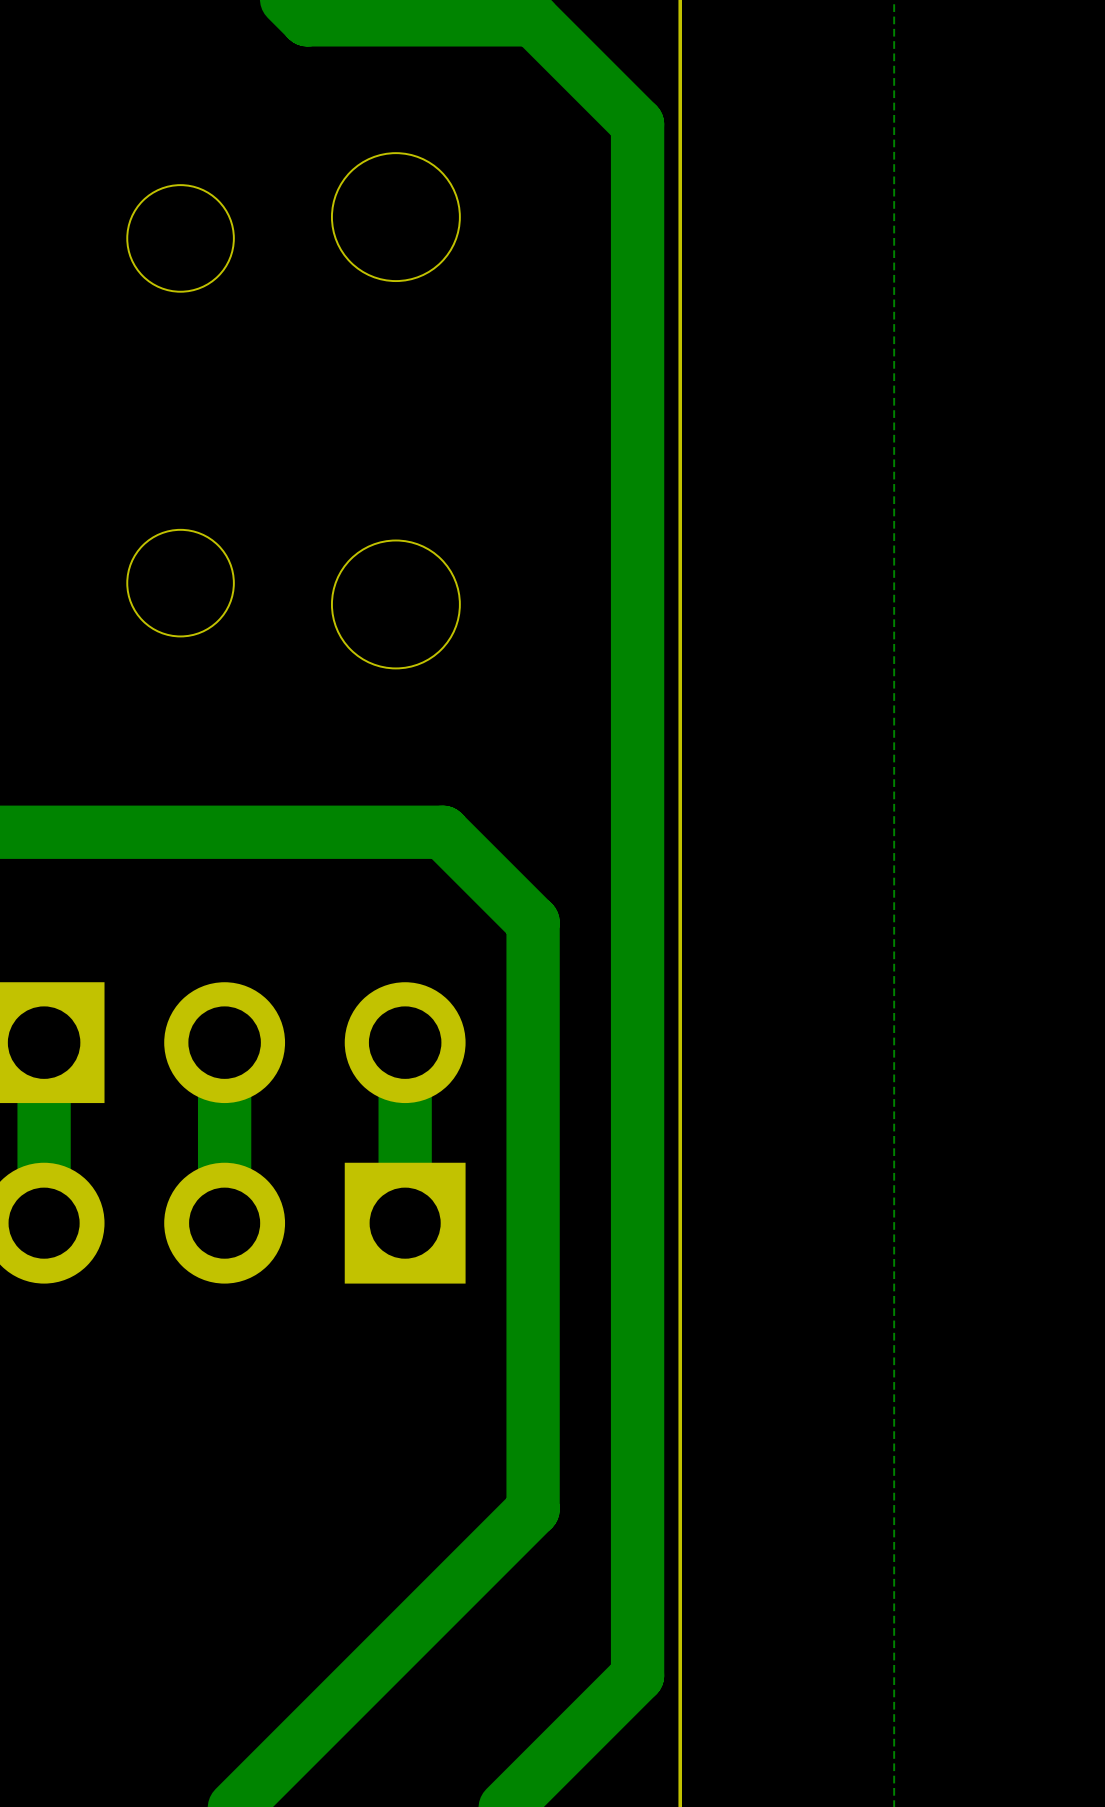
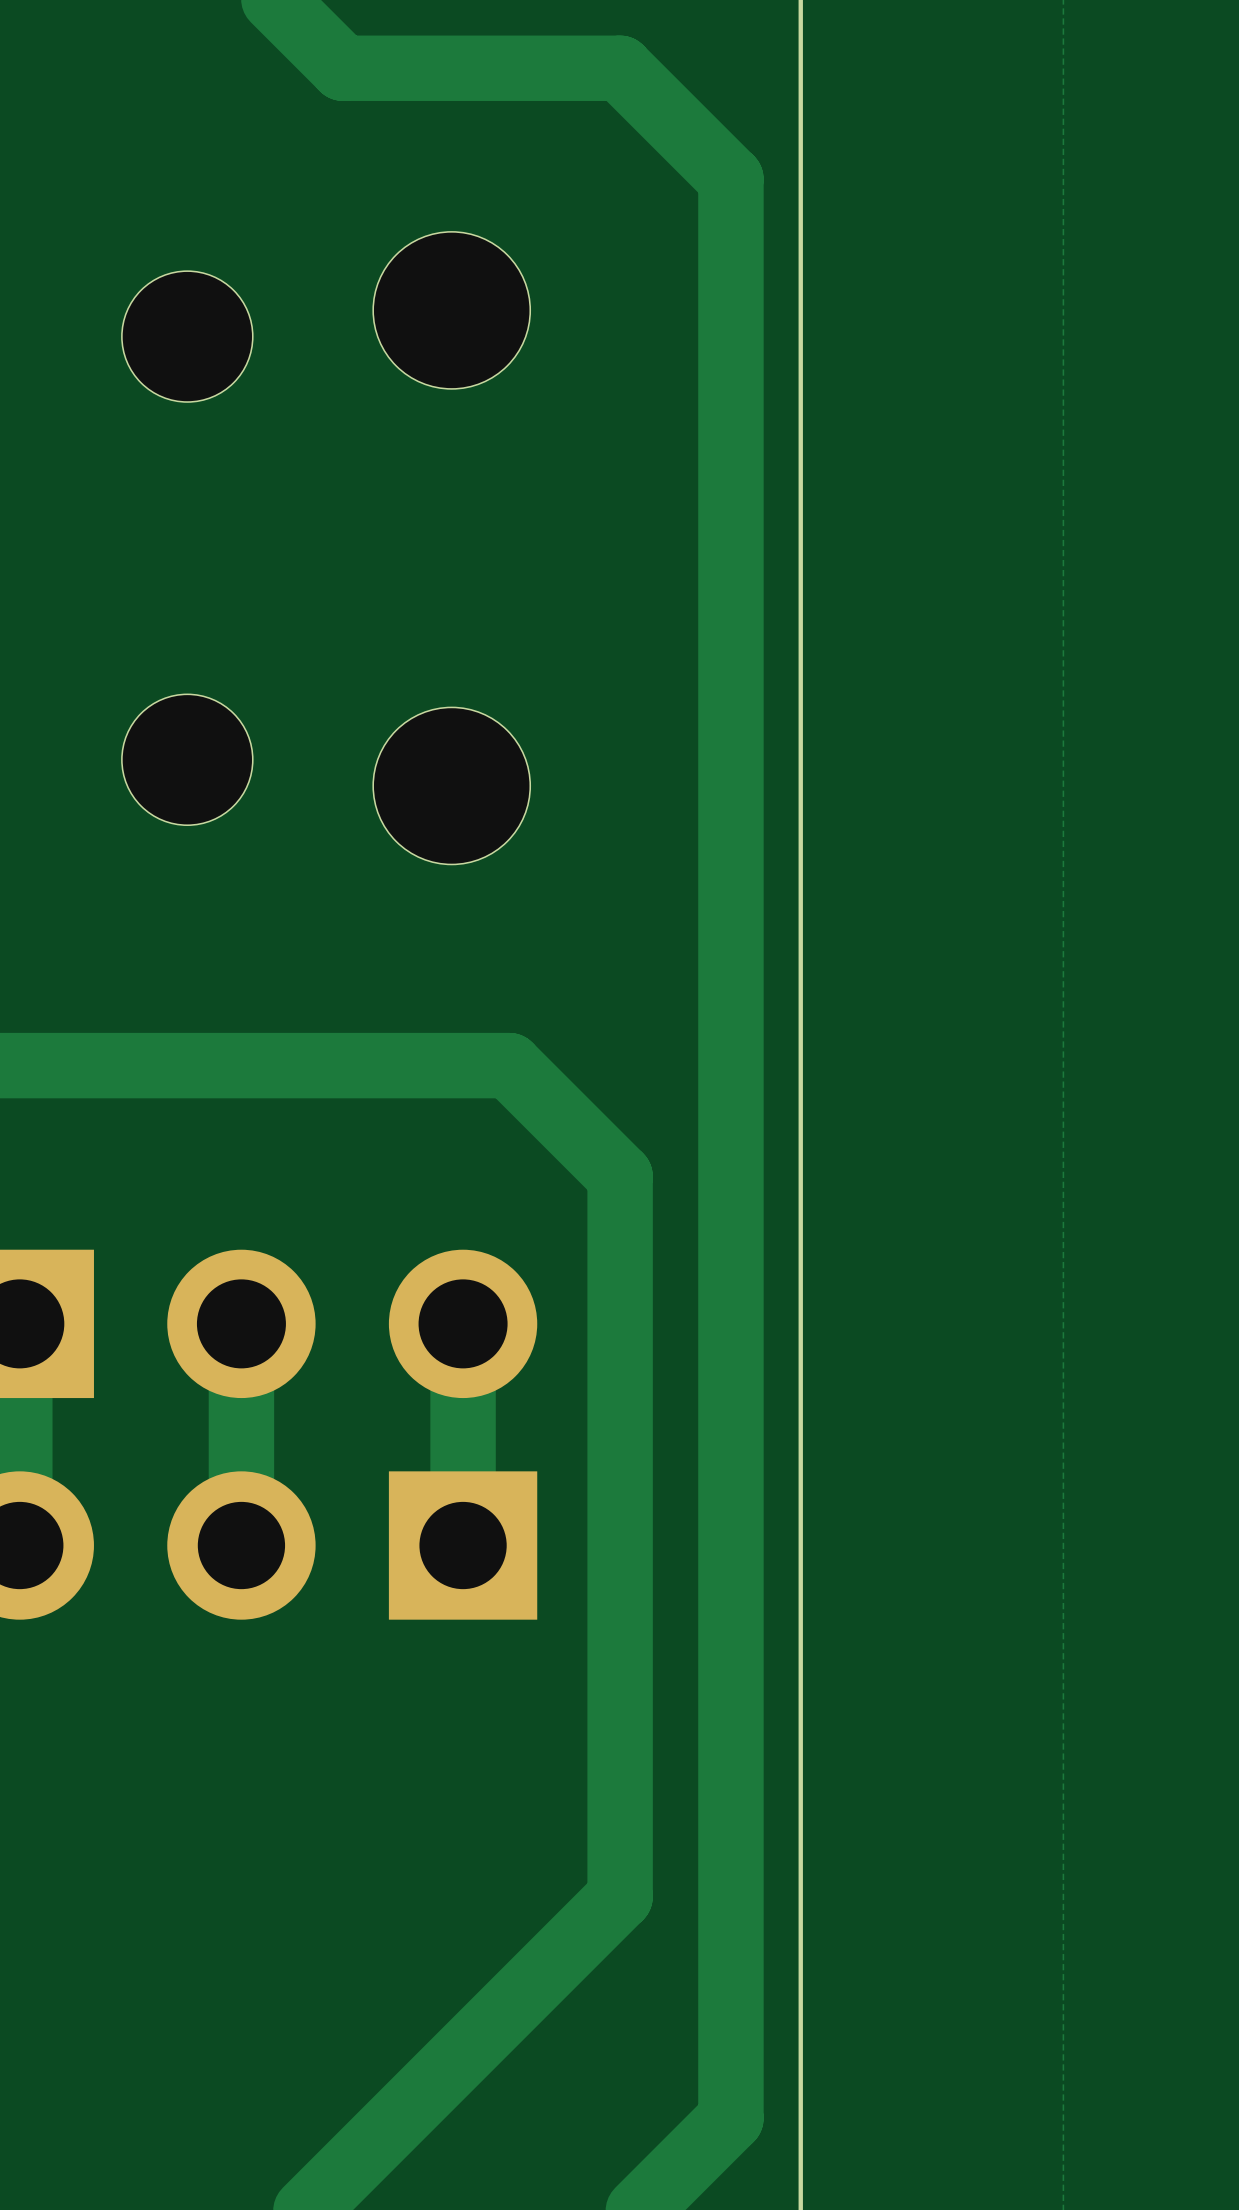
track: (623, 110) (637, 124) (637, 1675) (623, 1689) -> (730, 179) (730, 2118)

